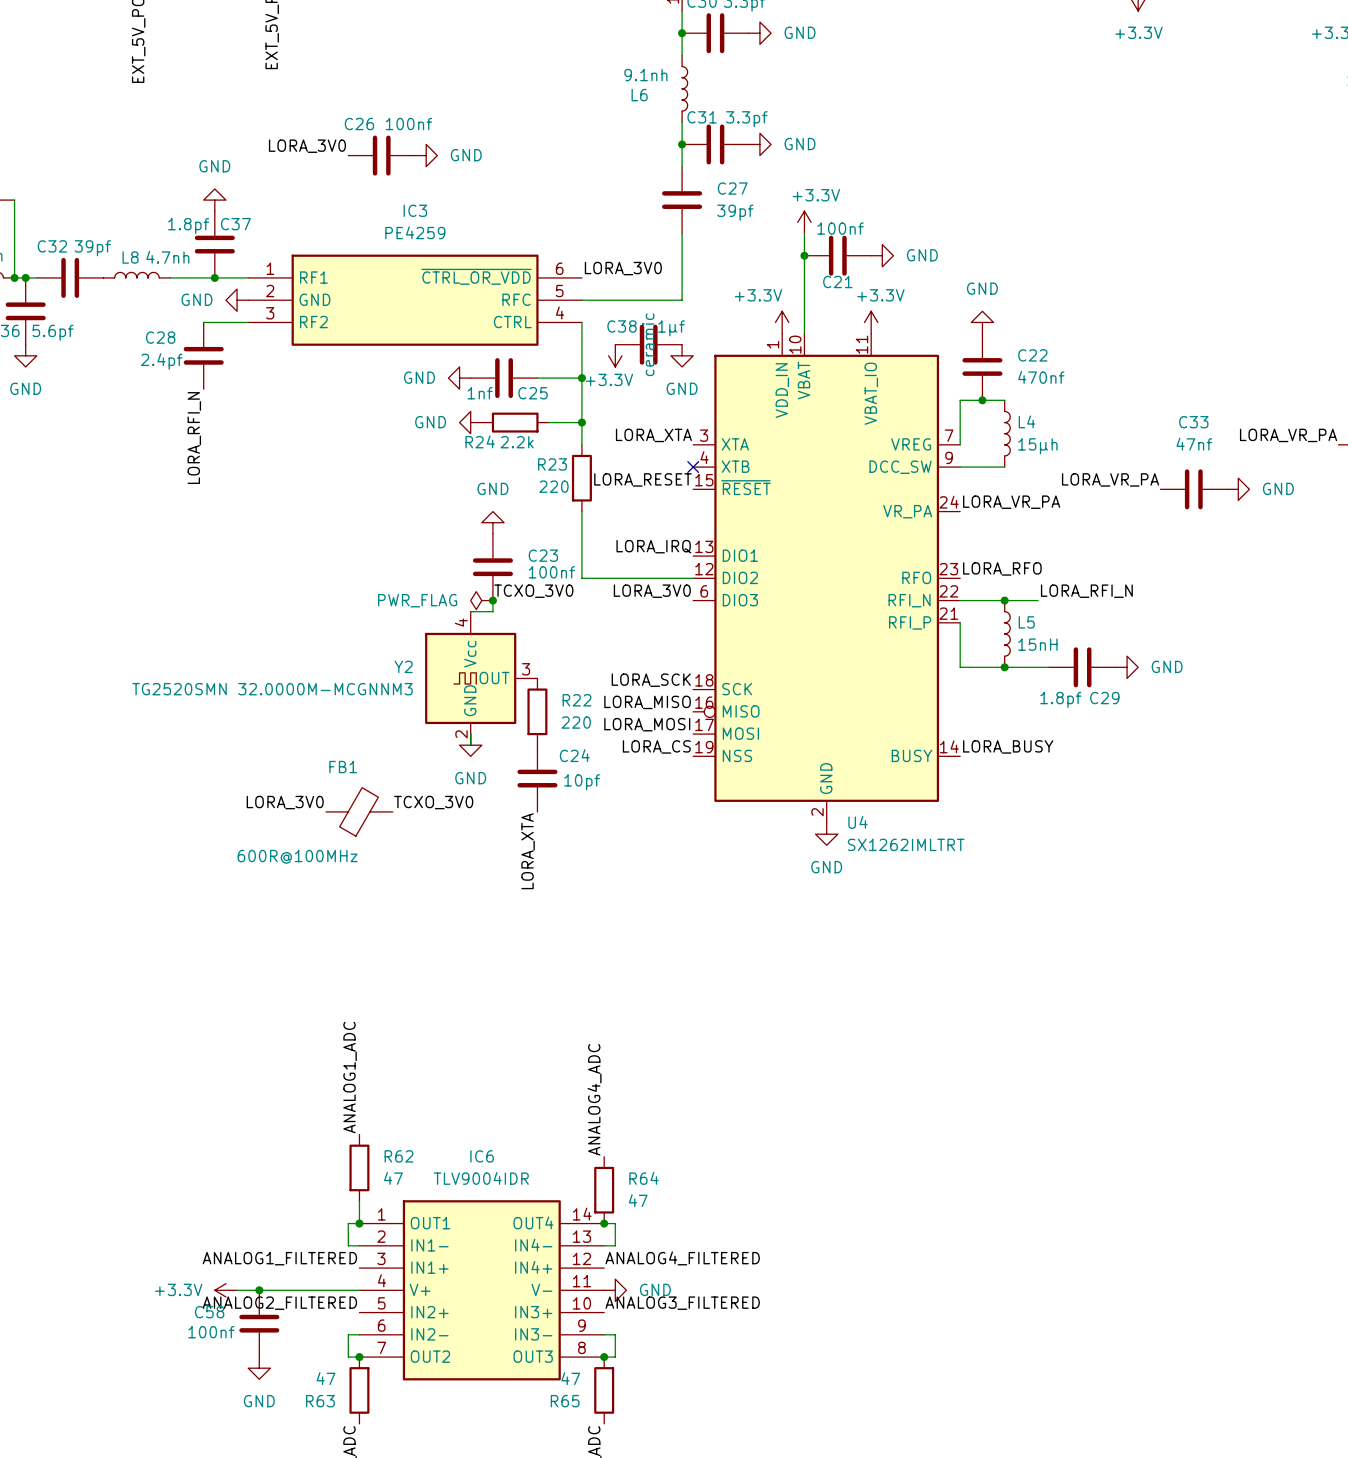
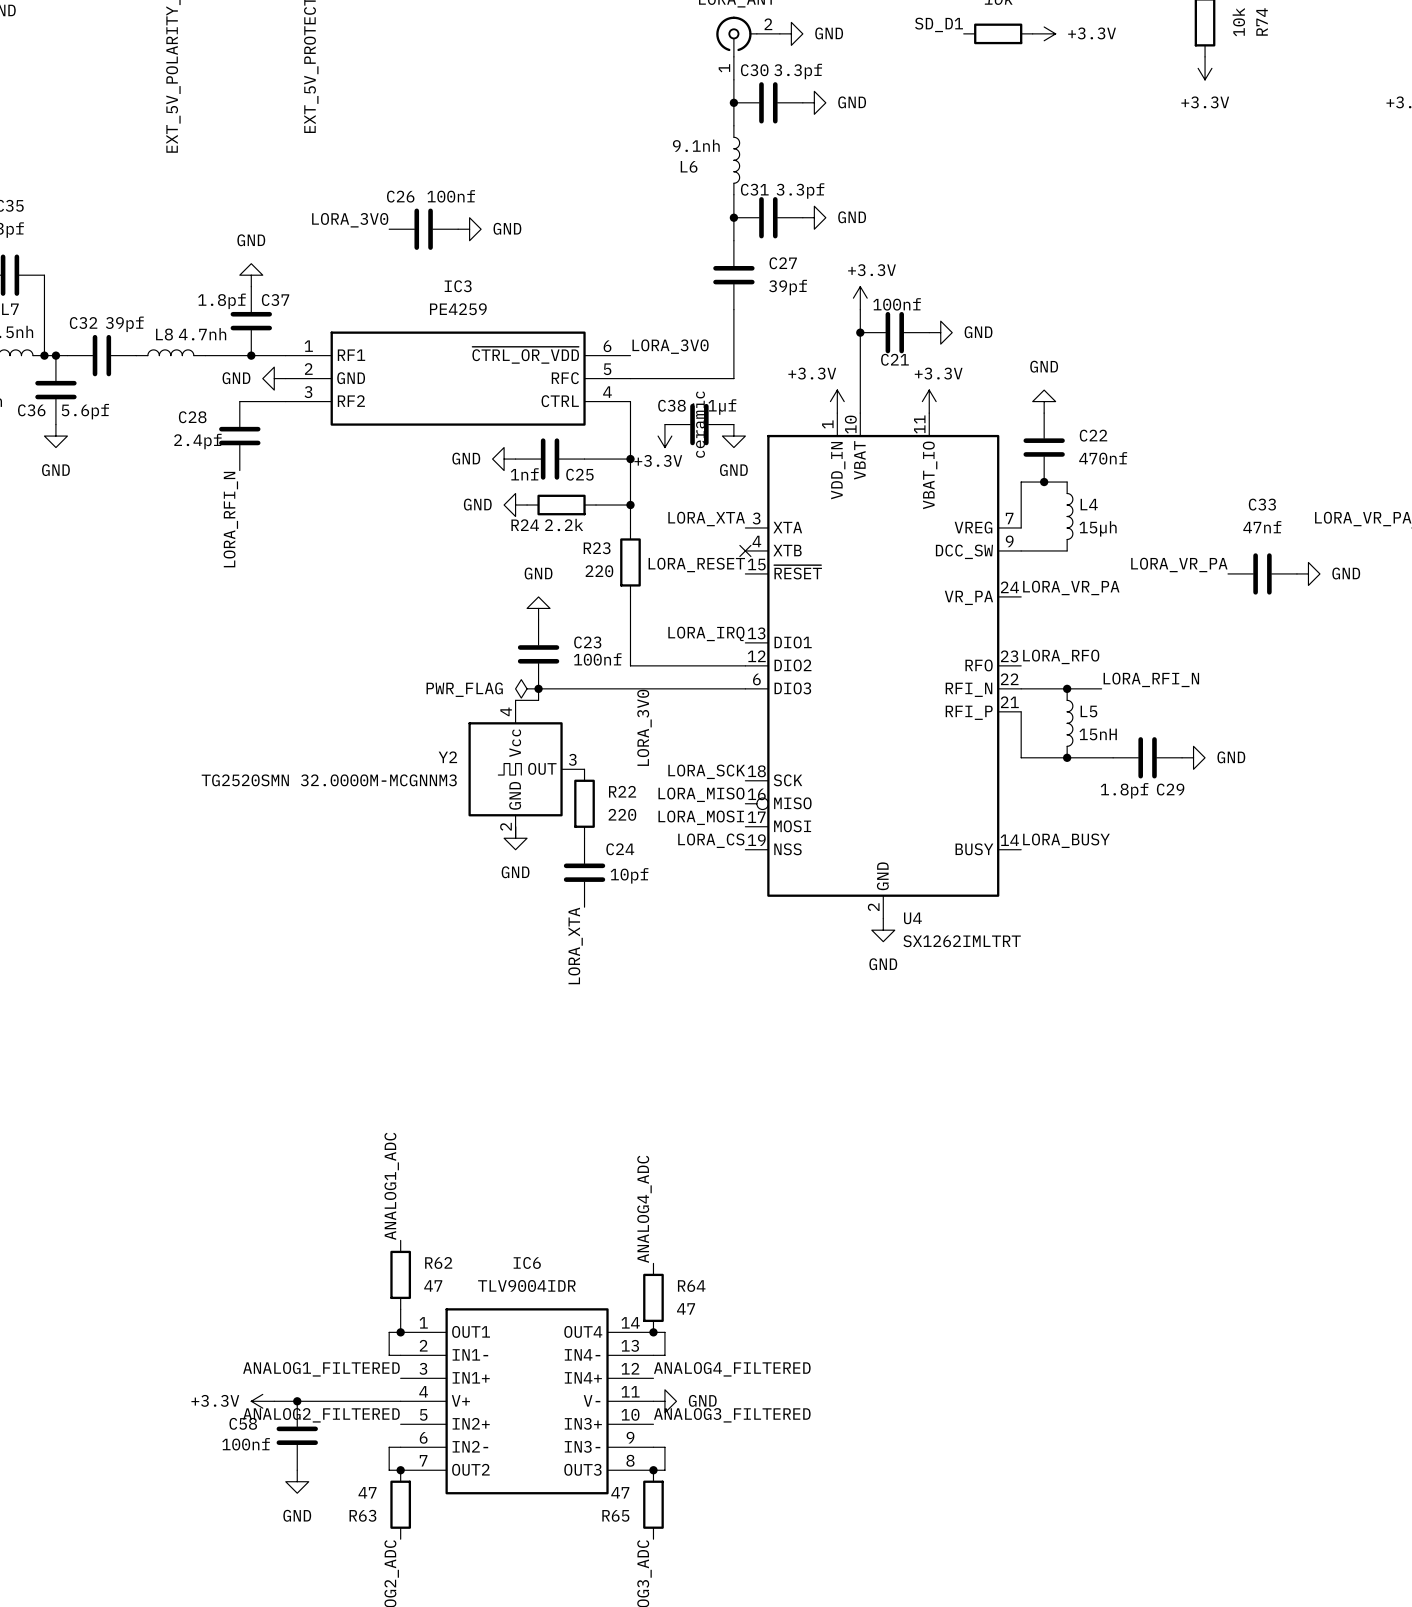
label: TCXO_3V0 (533, 591) -> none
label rotation: 0° (652, 591) -> 90° counterclockwise (644, 727)
wire: none -> (538, 688) (745, 688)
label: LORA_3V0 (285, 802) -> none
label: TCXO_3V0 (433, 802) -> none
FB1: 600R@100MHz (359, 811) -> none

